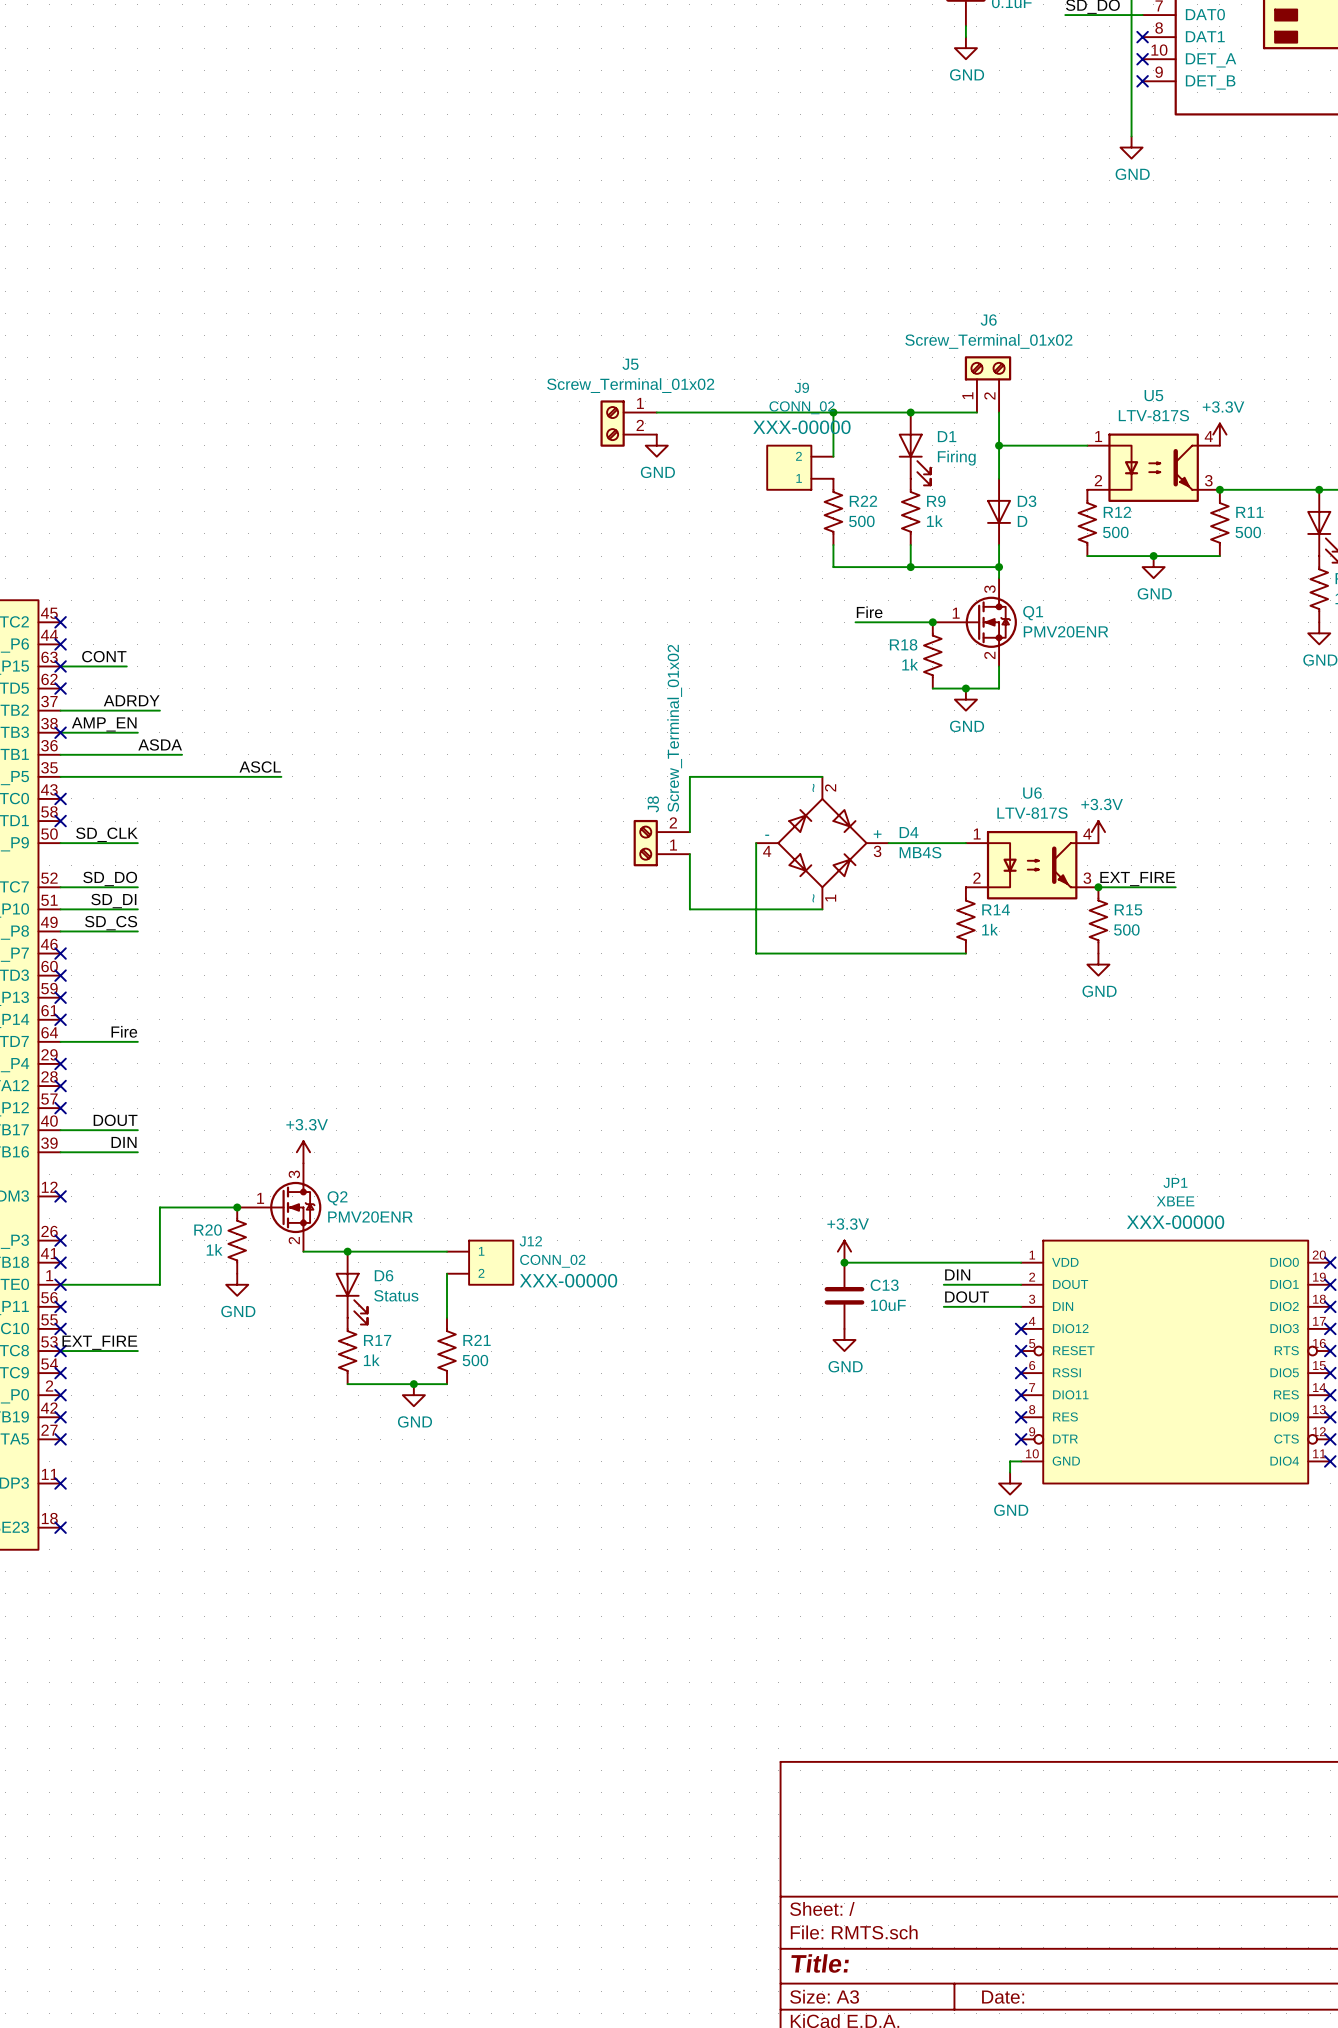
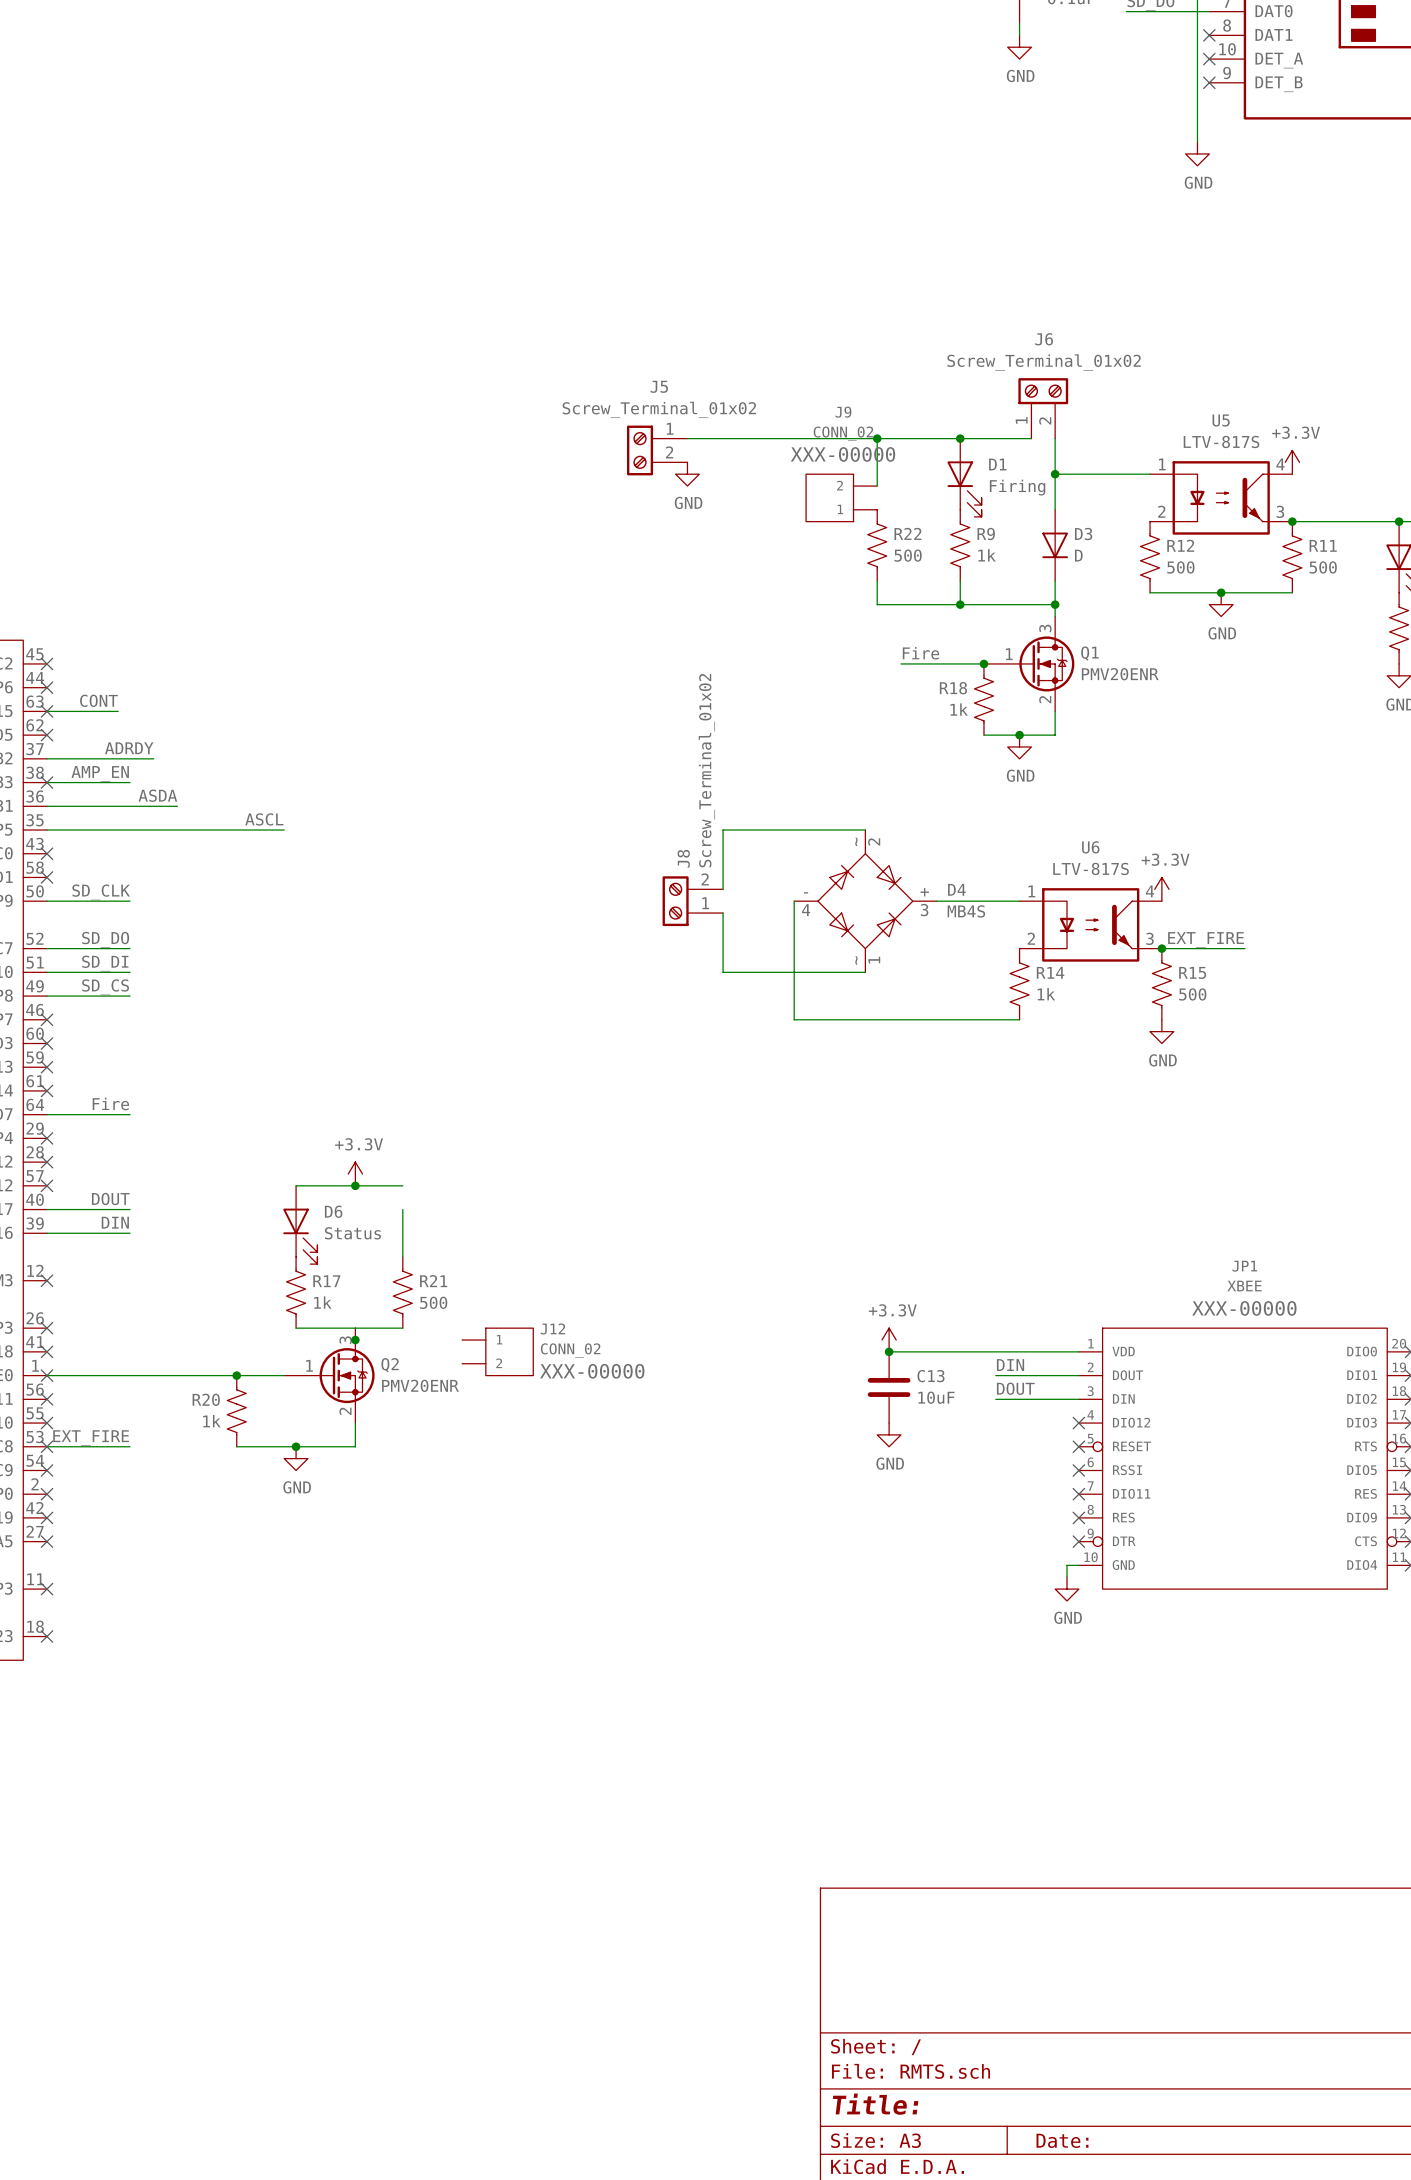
wire: none -> (296, 1185) (402, 1185)
junction: none -> (355, 1185)
power symbol position: +3.3V (303, 1152) -> +3.3V (355, 1173)
wire: (237, 1207) (159, 1207) (159, 1284) -> (284, 1375) (153, 1375)
junction: (237, 1207) -> none
Q2 position: (279, 1207) -> (329, 1375)
R20 position: (237, 1240) -> (236, 1411)
wire: (303, 1251) (447, 1251) -> none
wire: (447, 1273) (447, 1317) -> (402, 1209) (402, 1256)
power symbol: GND (237, 1284) -> none
junction: none -> (236, 1375)
D6 position: (351, 1288) -> (300, 1224)
wire: none -> (355, 1423) (355, 1446) (236, 1446)
junction: none -> (296, 1446)
R17 position: (347, 1351) -> (296, 1292)
R21 position: (447, 1351) -> (402, 1292)
power symbol: none -> GND (296, 1458)
wire: (347, 1384) (447, 1384) -> (296, 1328) (402, 1328)
junction: (413, 1384) -> none
power symbol: GND (413, 1395) -> none

